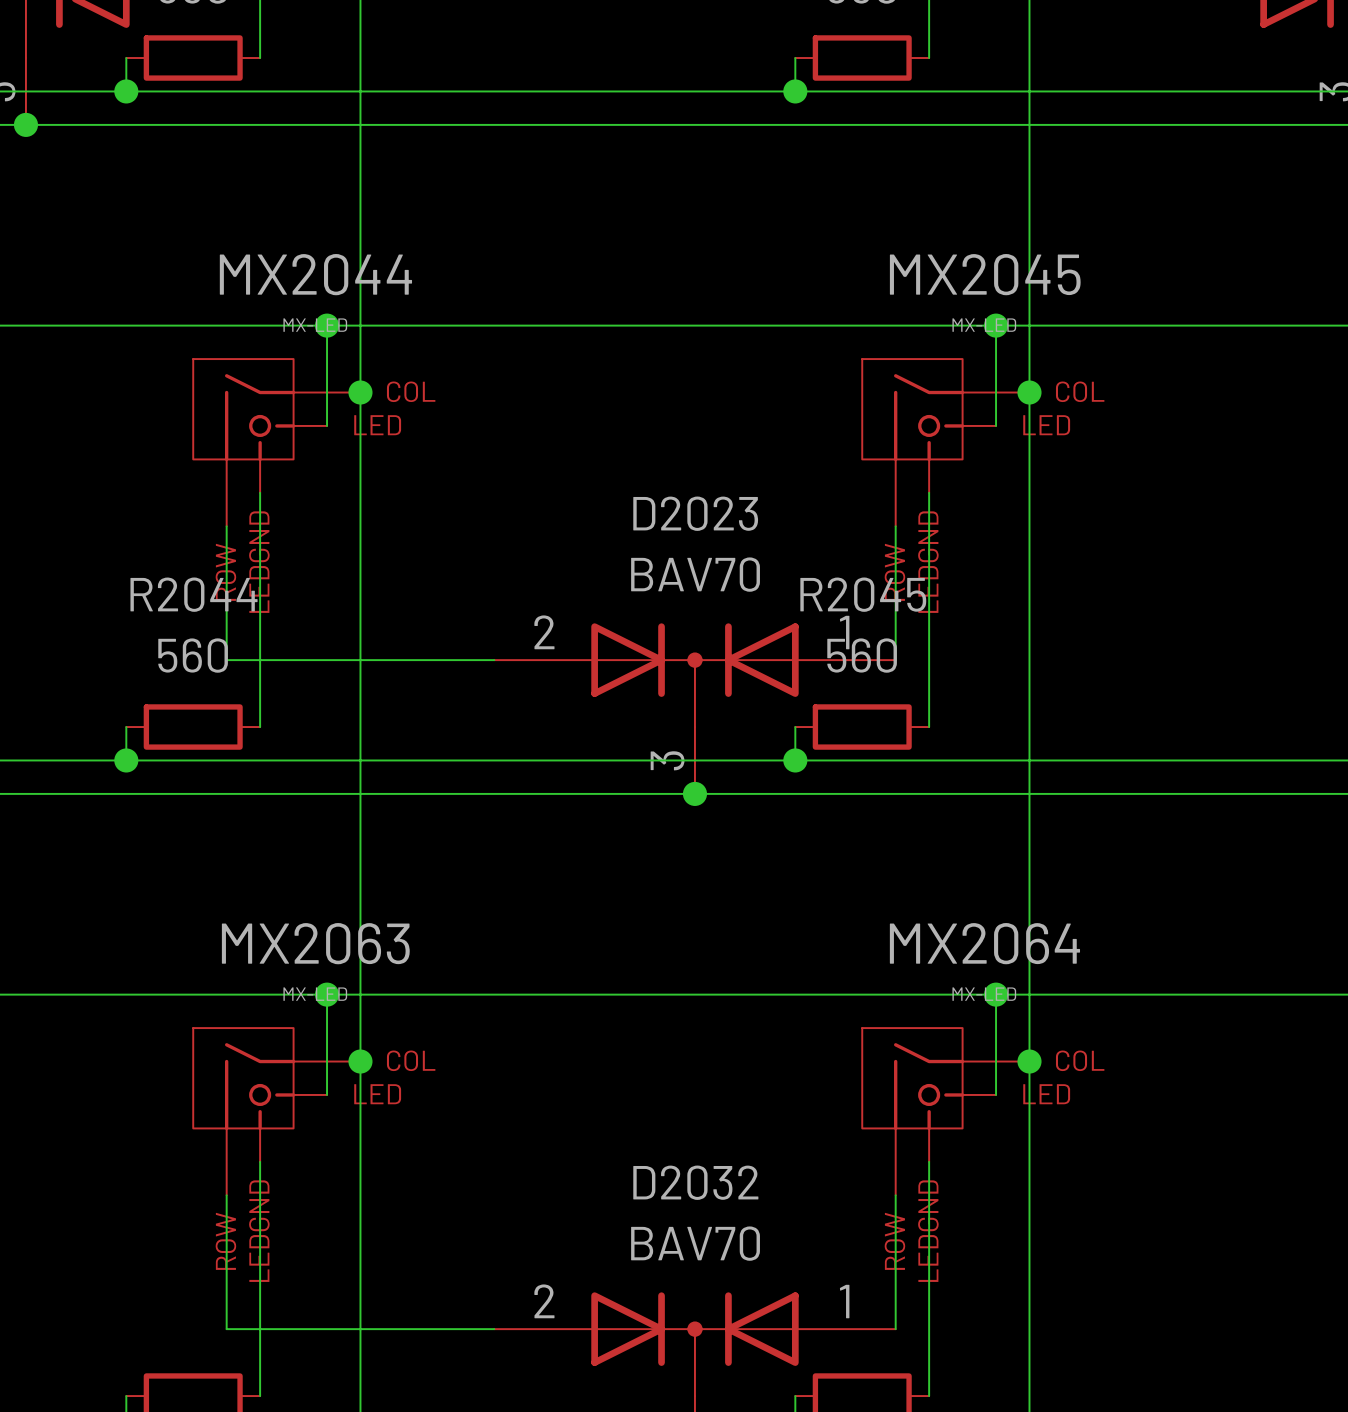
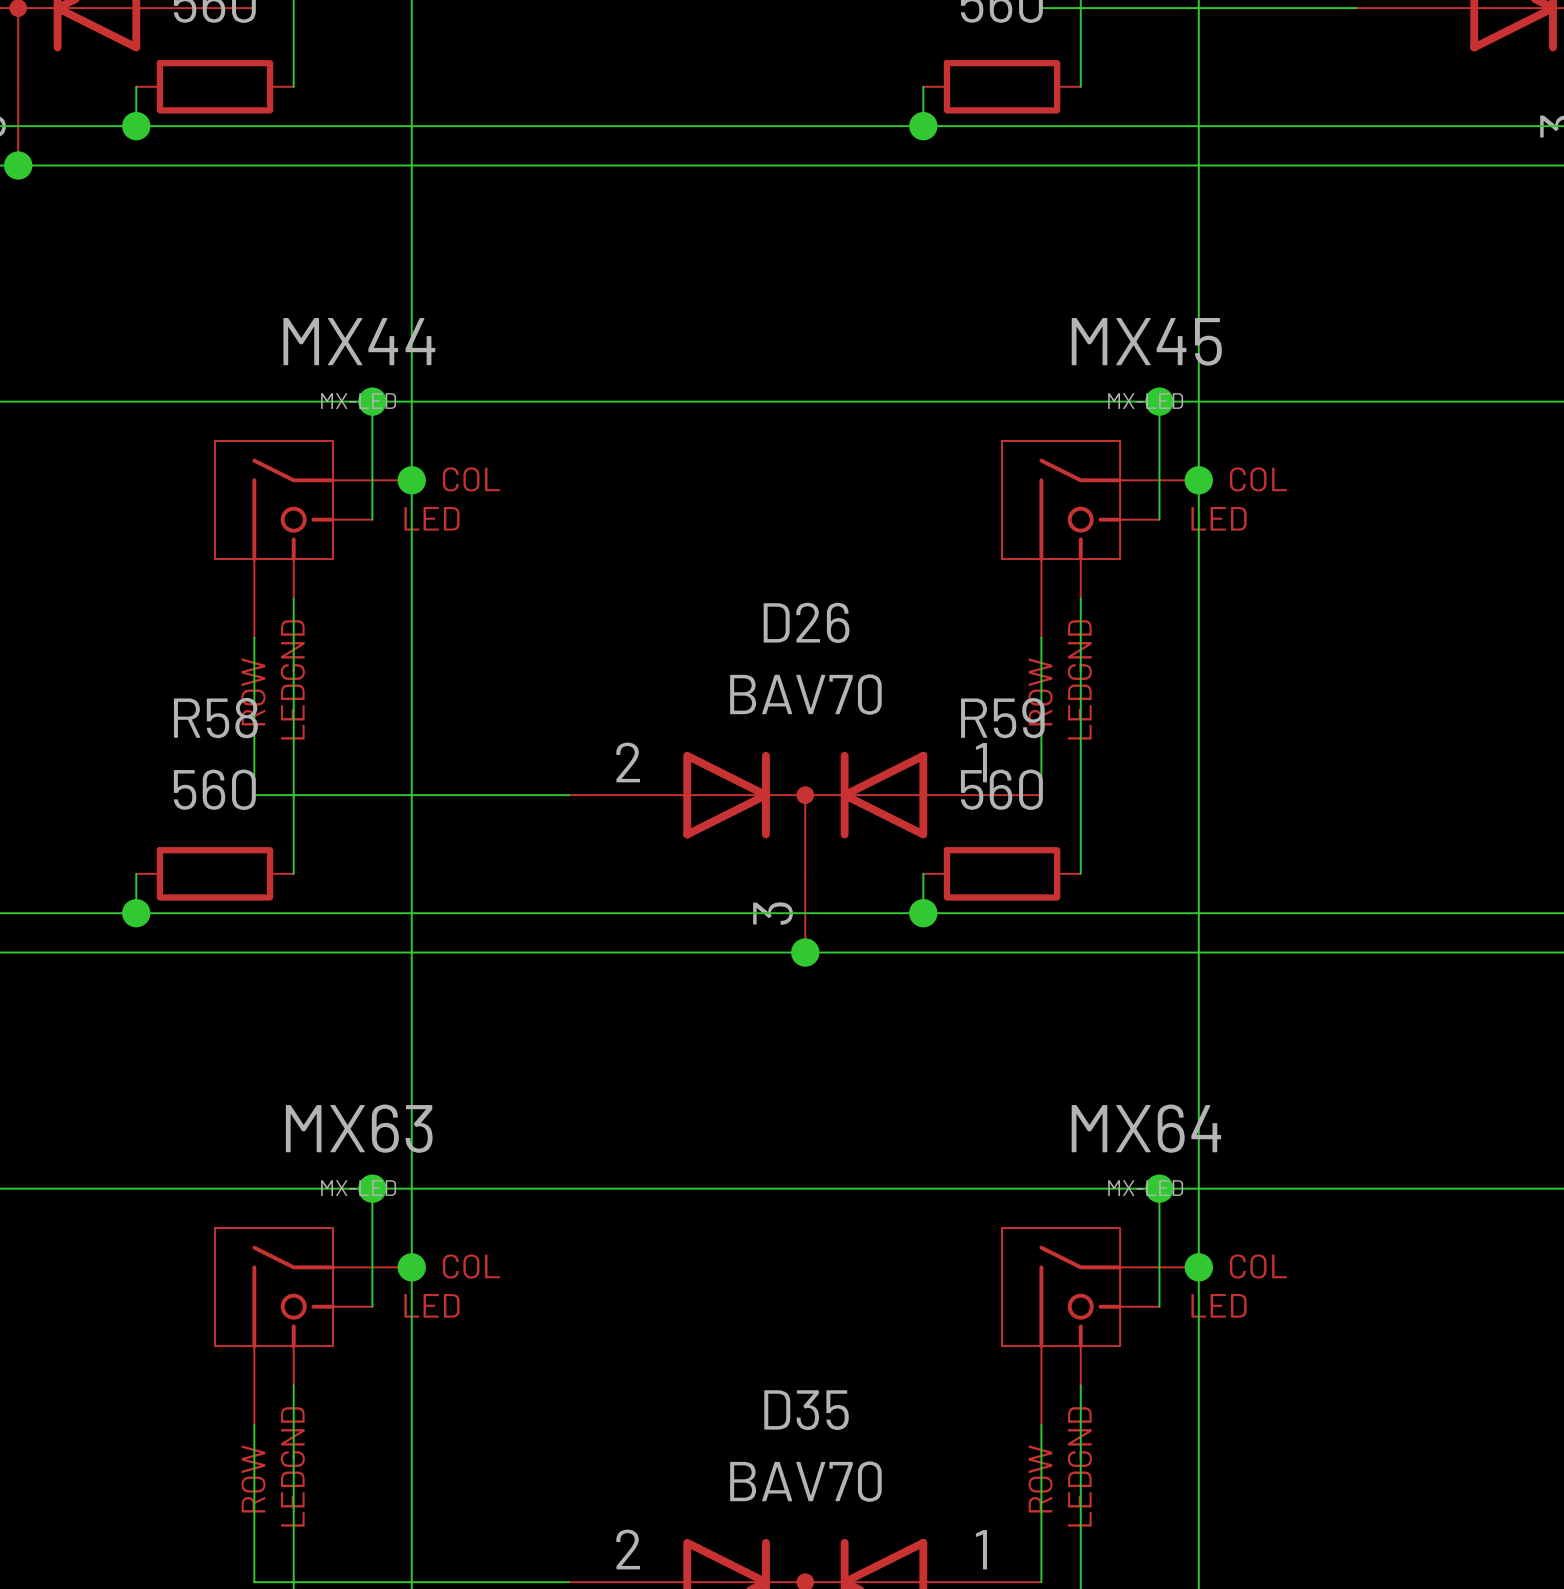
MX2044 name: MX2044 (315, 274) -> MX44 (359, 341)
MX2045 name: MX2045 (985, 274) -> MX45 (1146, 341)
D2023 name: D2023 (695, 513) -> D26 (806, 622)
R2044 name: R2044 (194, 594) -> R58 (215, 718)
R2045 name: R2045 (863, 594) -> R59 (1002, 718)
MX2063 name: MX2063 (315, 943) -> MX63 (359, 1128)
MX2064 name: MX2064 (984, 943) -> MX64 (1146, 1128)
D2032 name: D2032 (695, 1182) -> D35 (806, 1410)

